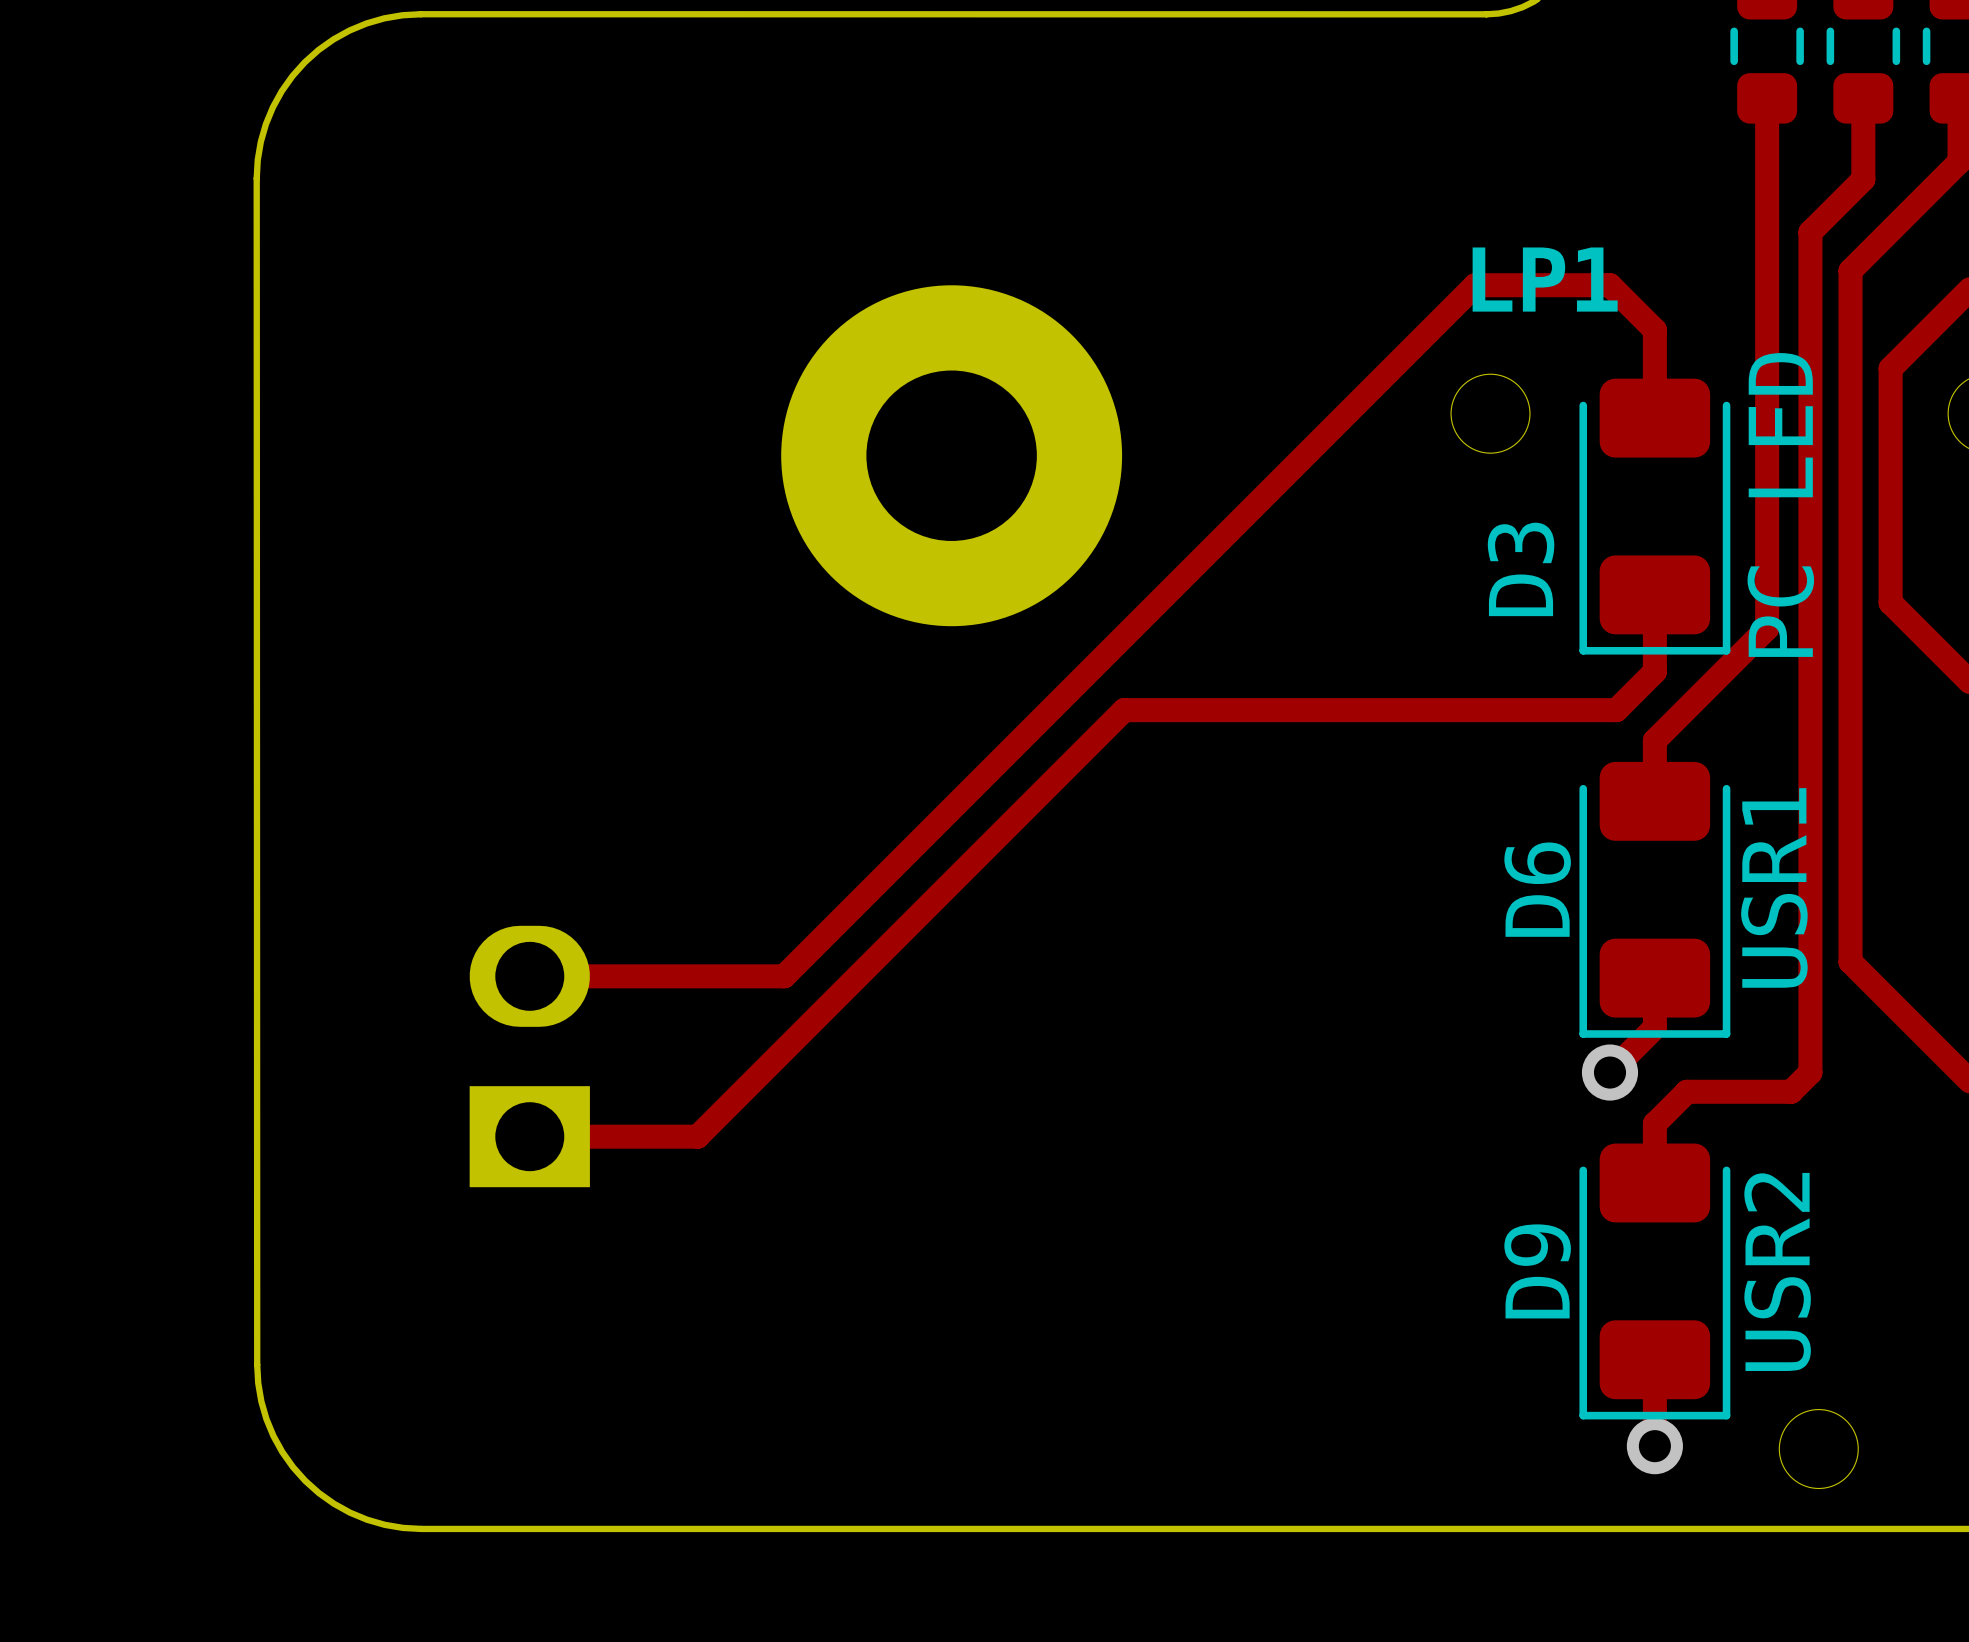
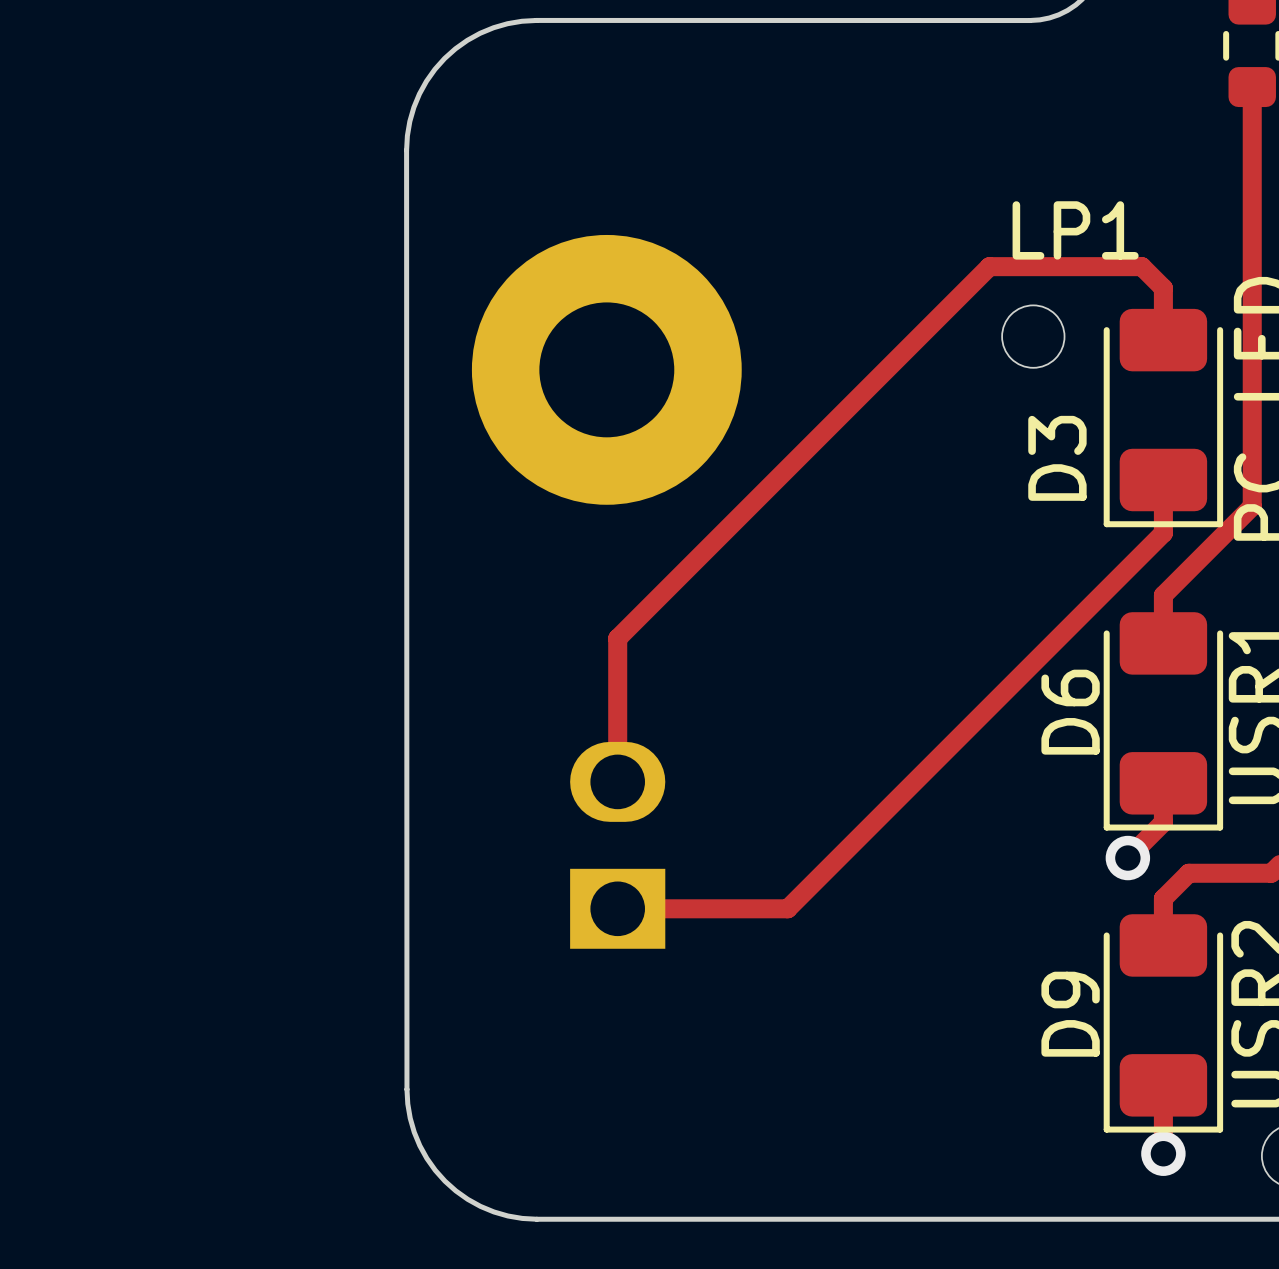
board edge: (862, 14) (420, 14) (384, 18) (366, 23) (333, 39) (304, 62) (292, 76) (272, 107) (265, 124) (260, 141) (256, 178) (257, 1364) (261, 1401) (273, 1436) (293, 1467) (319, 1493) (350, 1512) (367, 1519) (402, 1527) (863, 1528) -> (536, 20) (507, 23) (480, 33) (455, 48) (444, 58) (426, 81) (419, 93) (409, 121) (406, 150) (407, 1103) (414, 1132) (419, 1145) (435, 1170) (445, 1181) (467, 1199) (480, 1206) (507, 1215) (536, 1219)
track: (1435, 325) (1475, 285) (1609, 285) (1654, 330) (1654, 352) -> (989, 266) (1141, 266) (1163, 288)
track: (1654, 662) (1654, 671) (1616, 710) (1124, 710) (697, 1136) (529, 1136) -> (1163, 533) (787, 908) (617, 908)
track: (965, 795) (784, 976) (529, 976) -> (617, 638) (617, 781)
part position: (529, 1056) -> (617, 845)

